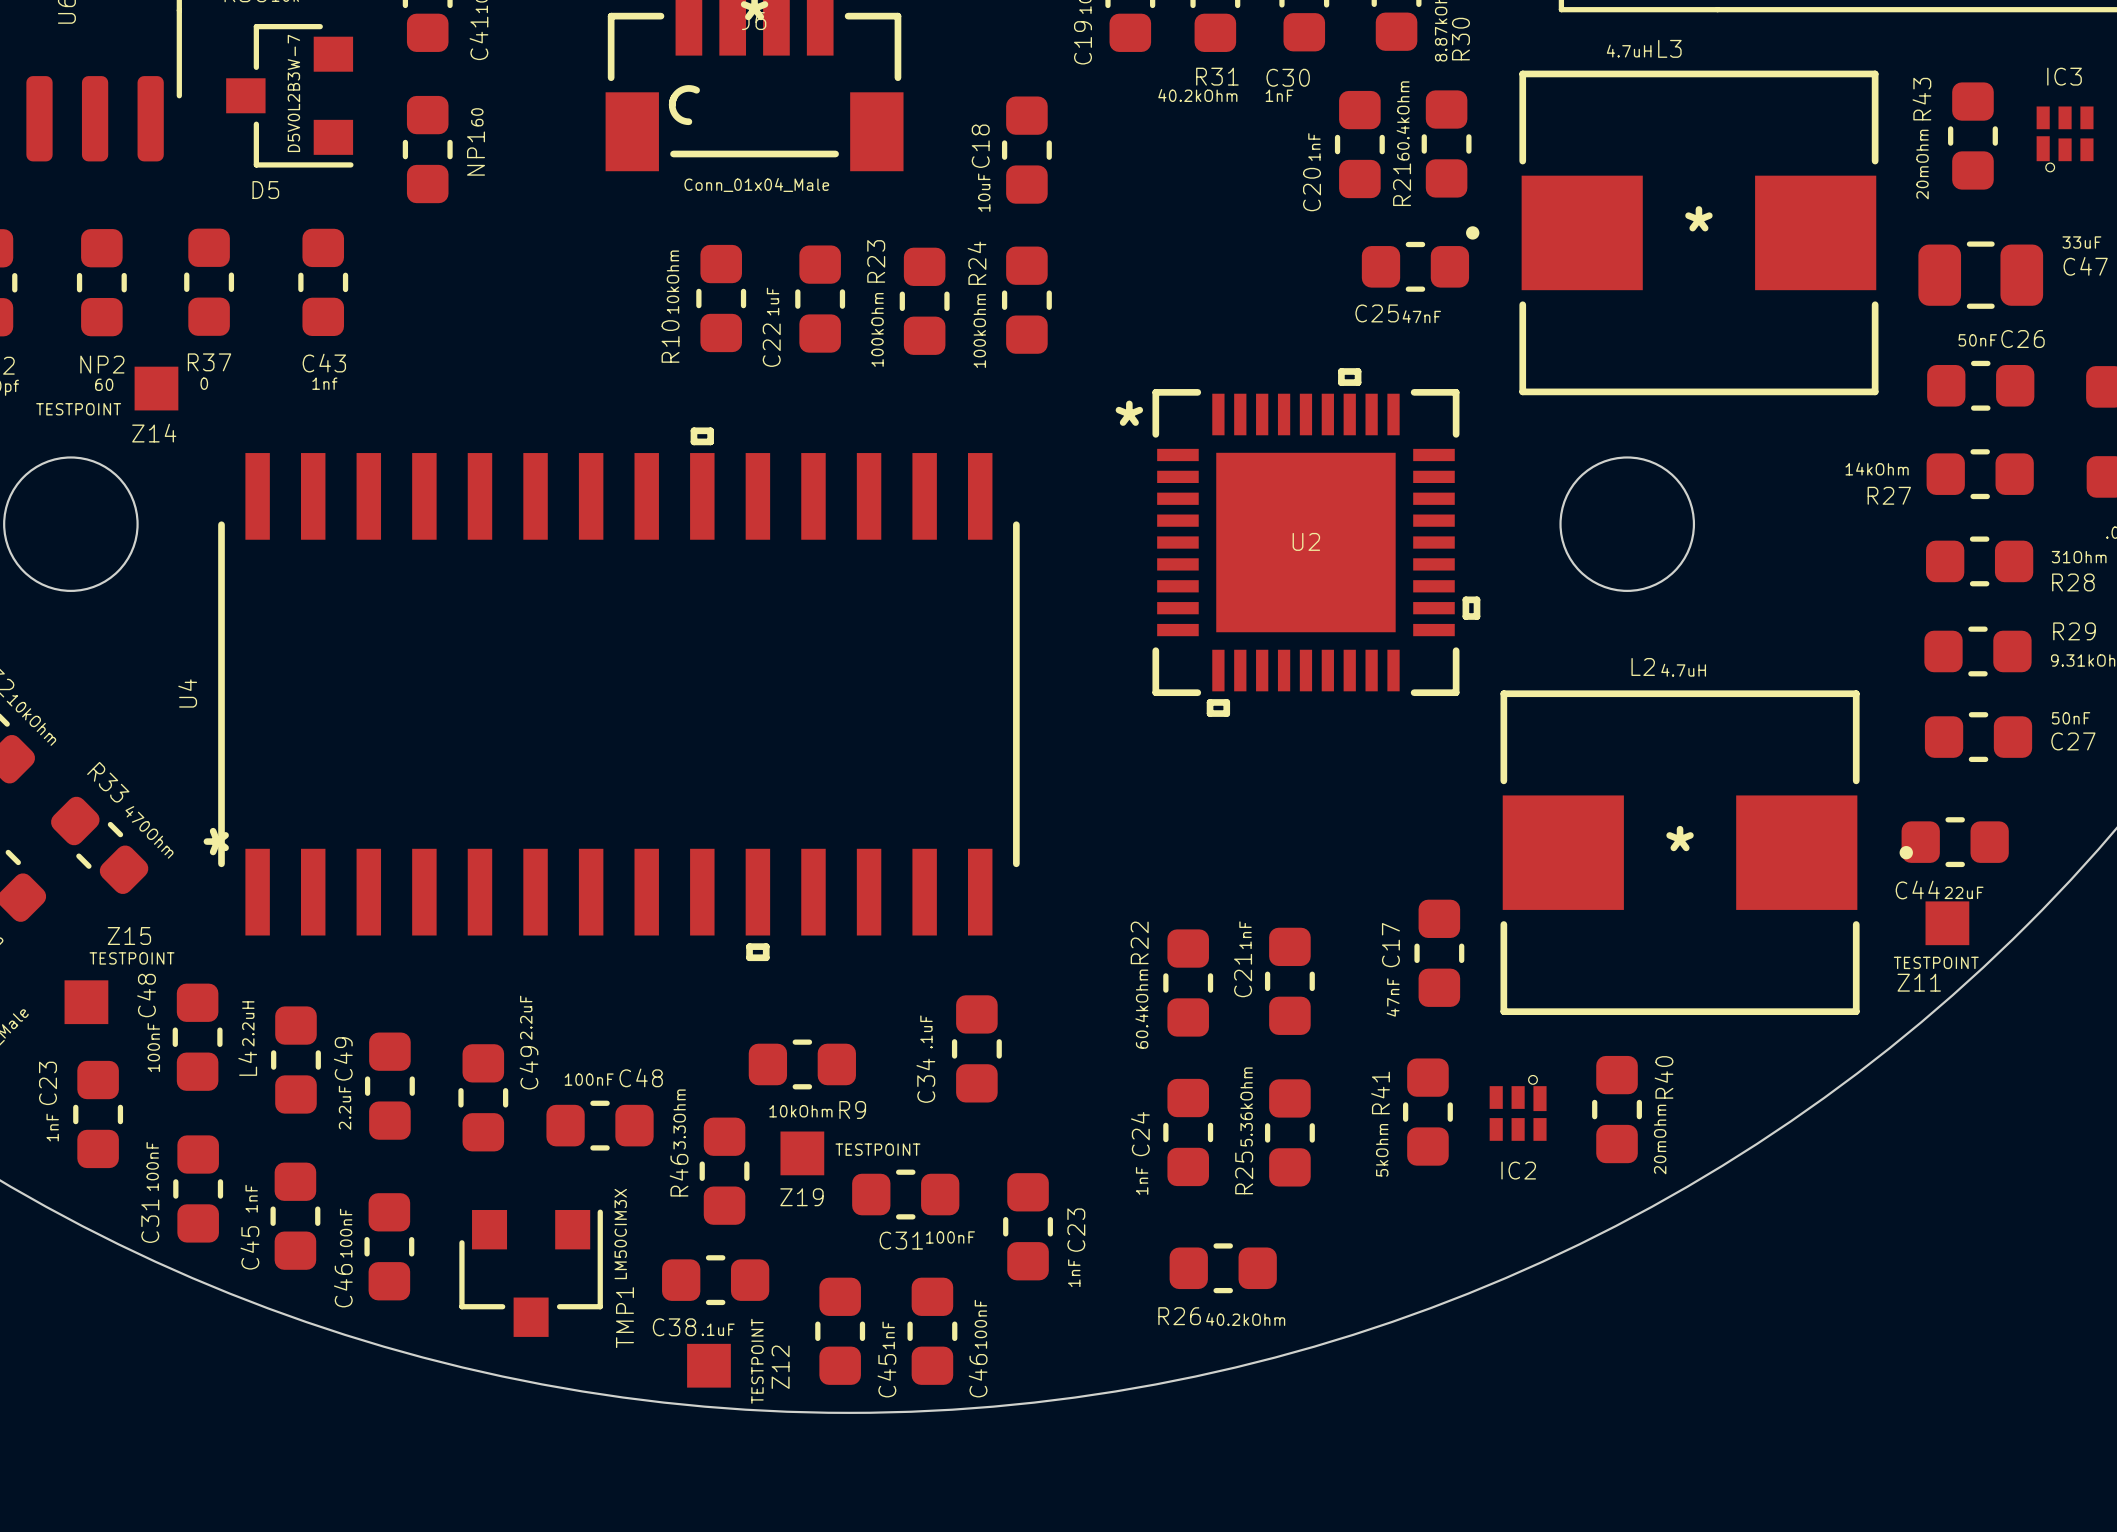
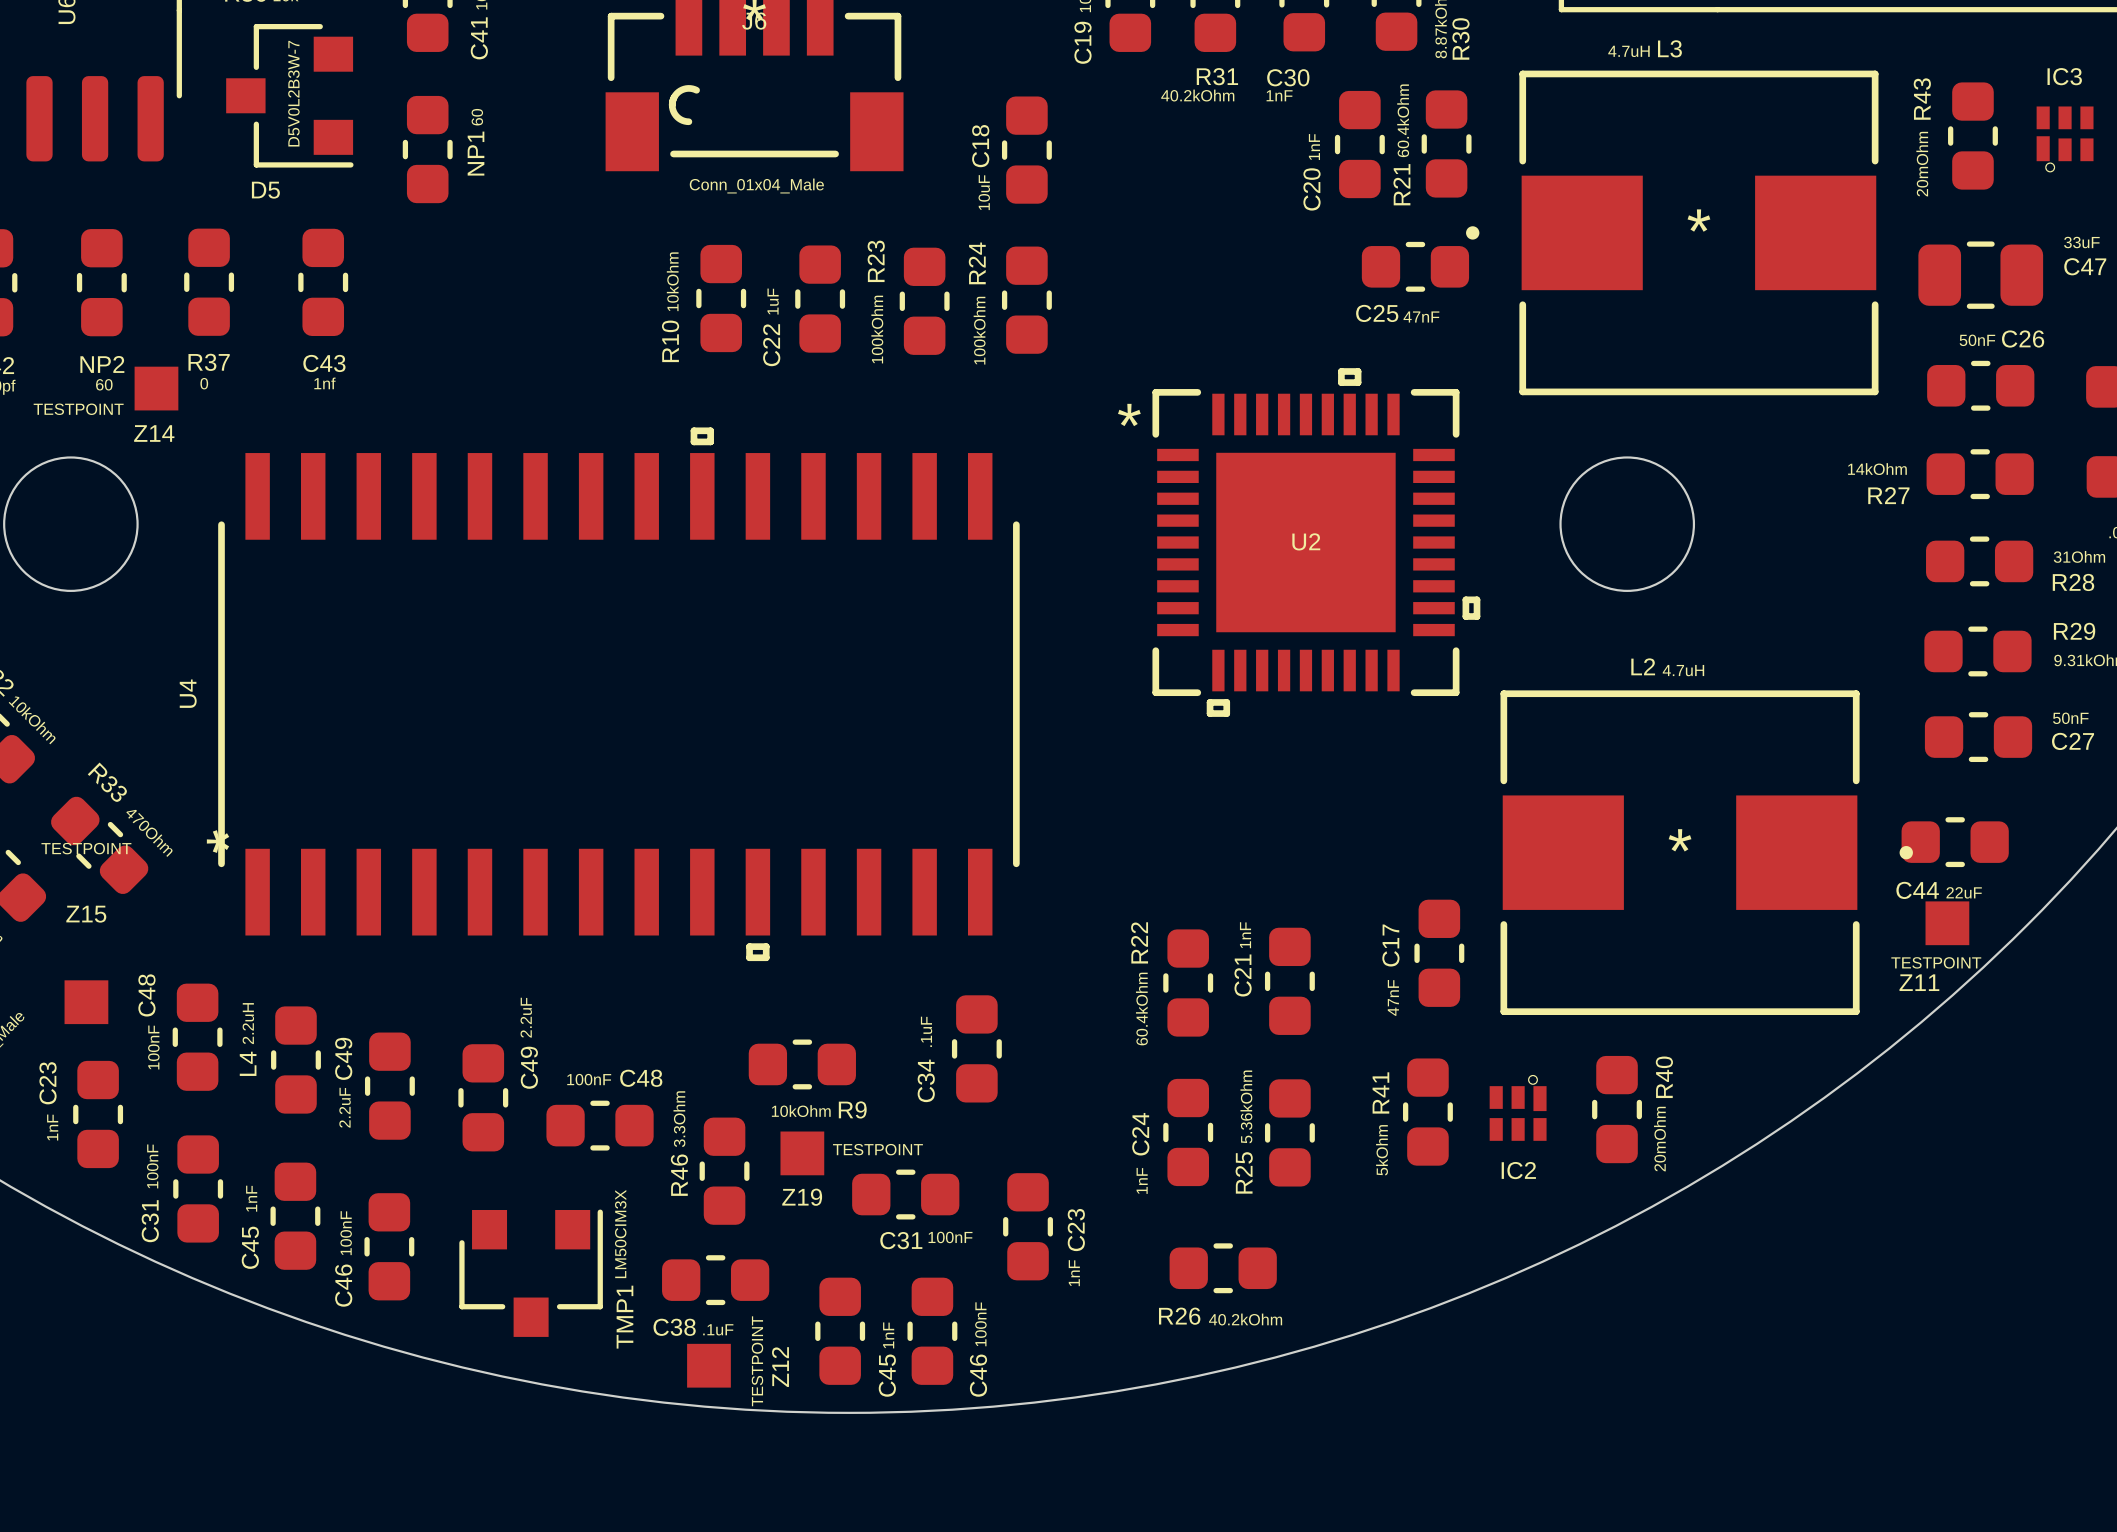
Z15 name position: Z15 (129, 935) -> Z15 (86, 914)
Z15 value position: TESTPOINT (132, 958) -> TESTPOINT (86, 848)

